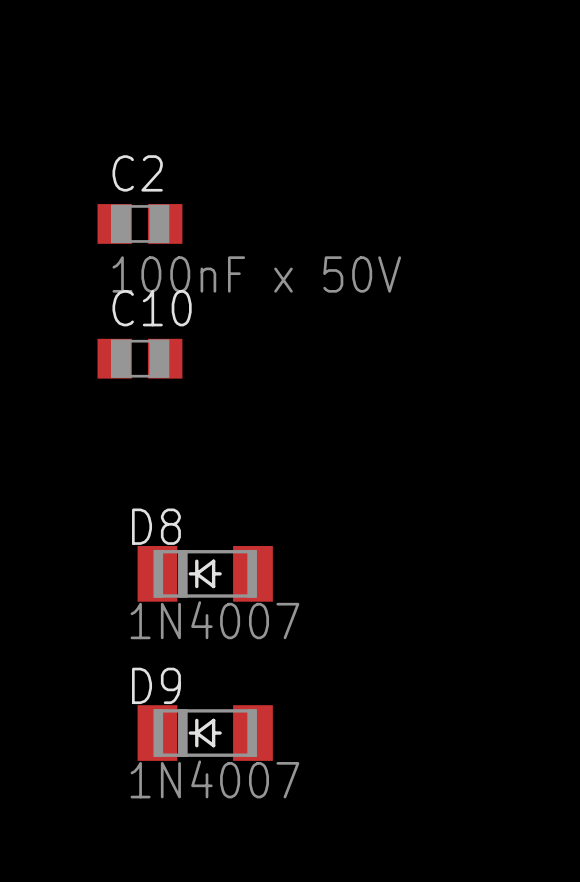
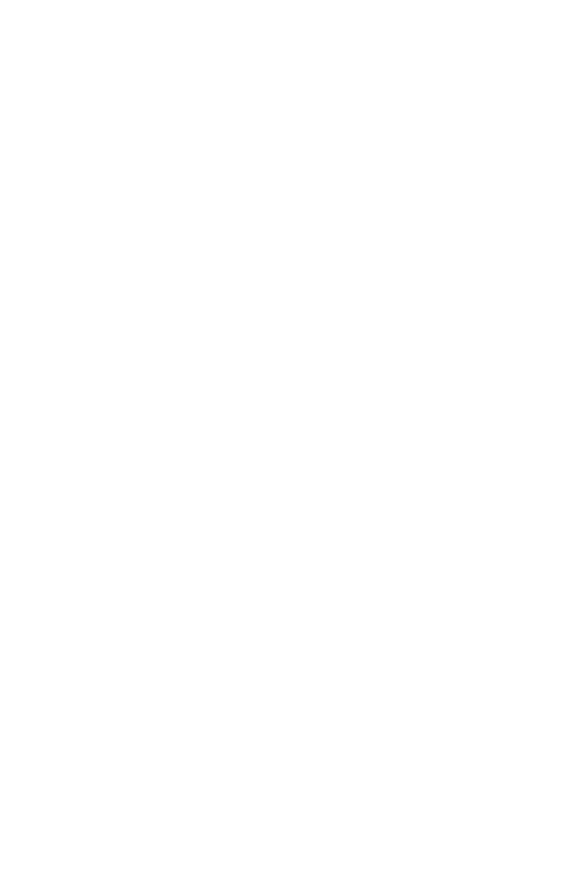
C2: 100nF x 50V (139, 223) -> none
C10: (139, 358) -> none
D8: 1N4007 (205, 573) -> none
D9: 1N4007 (205, 733) -> none

